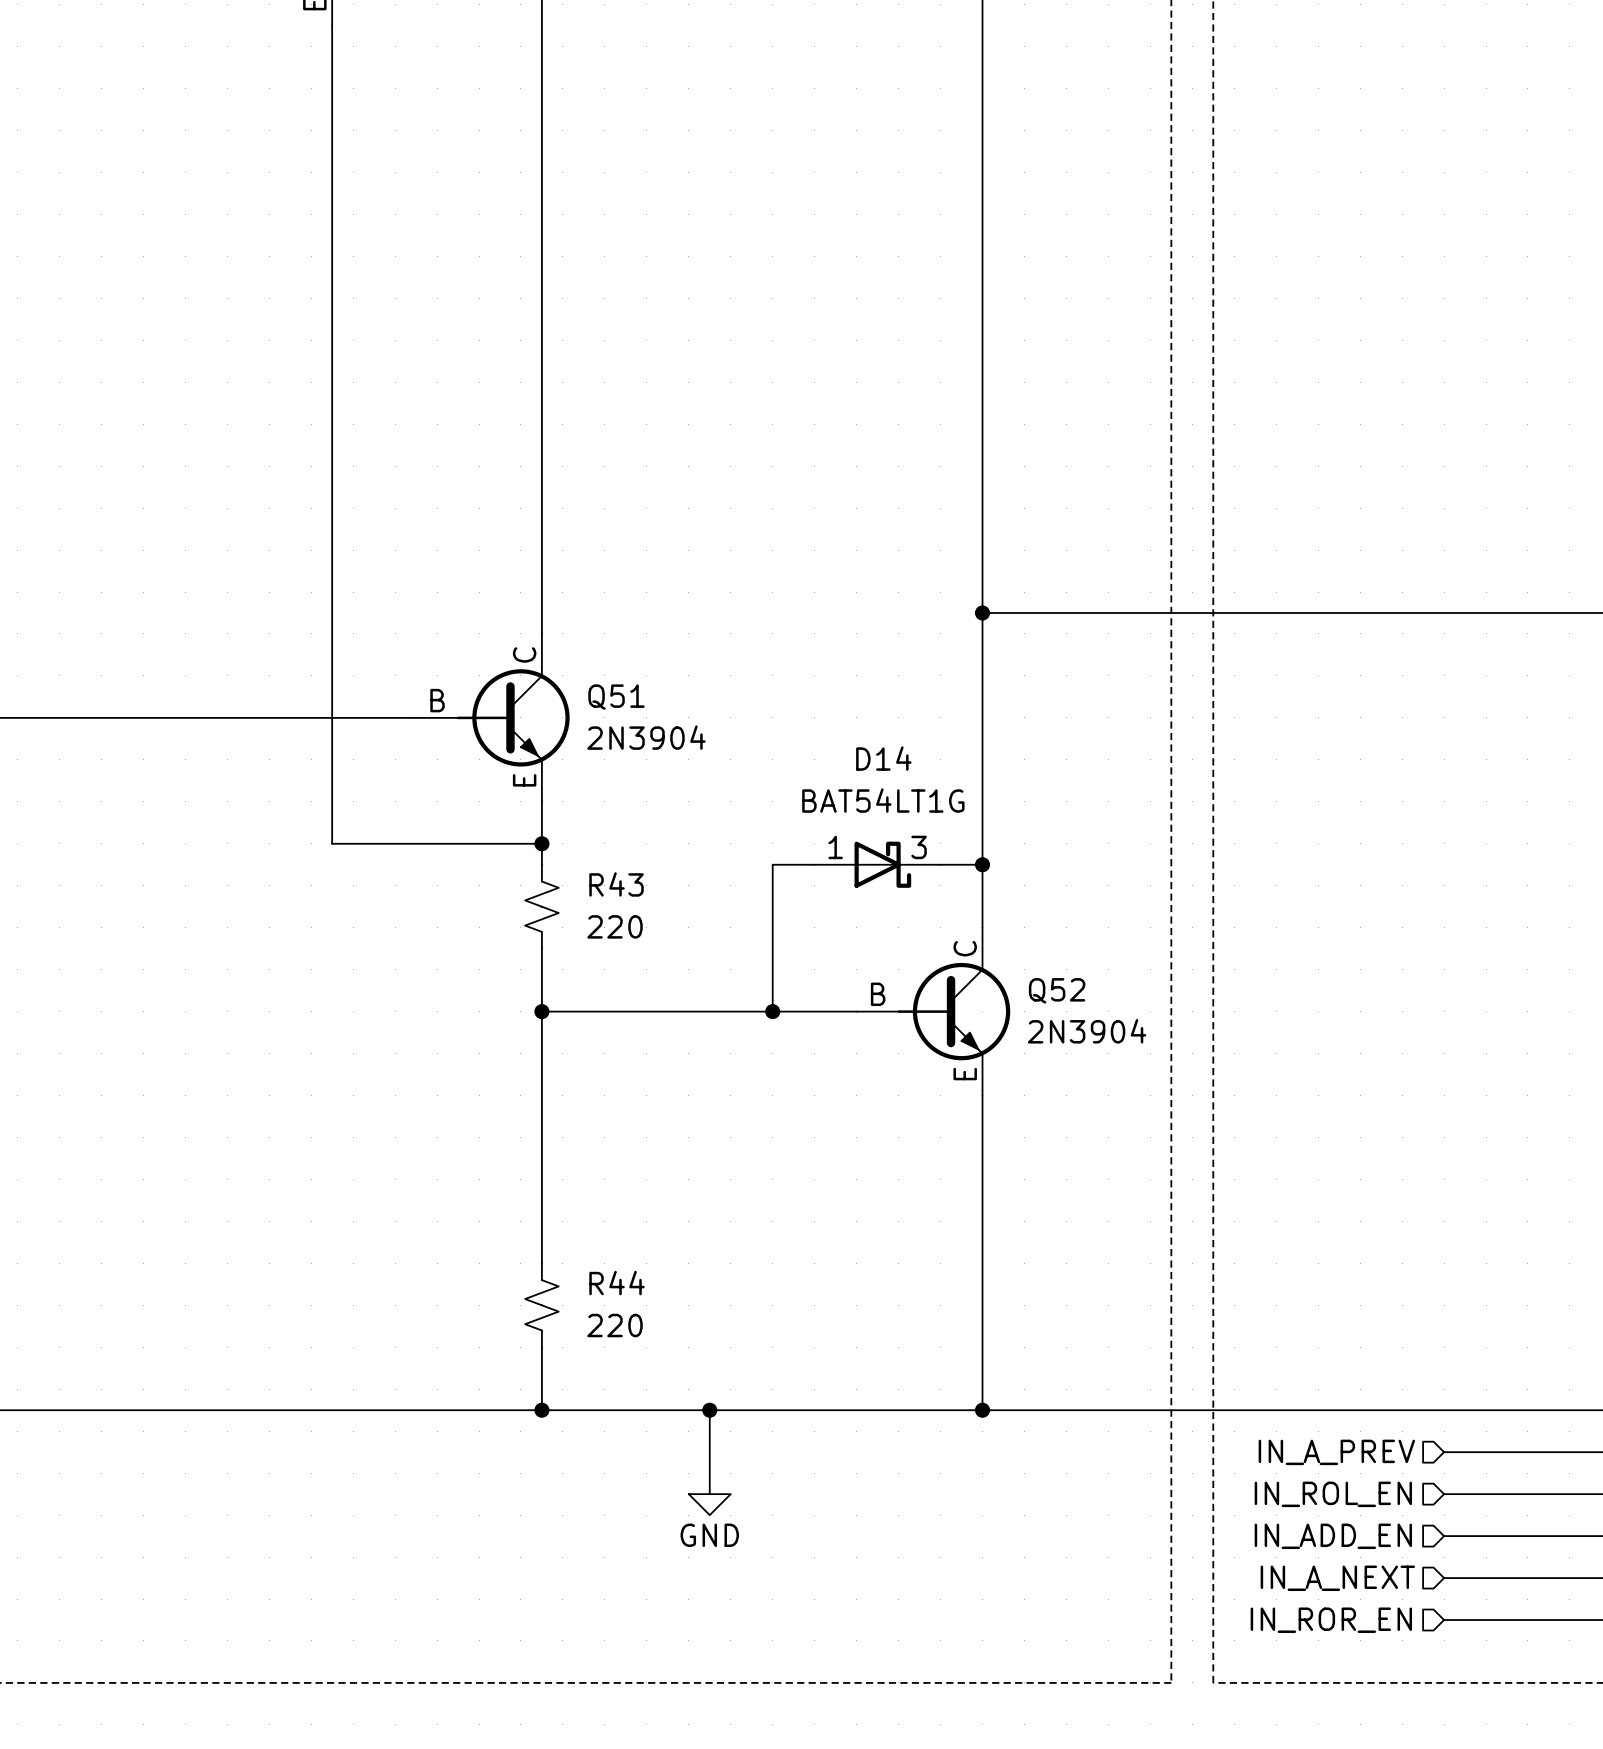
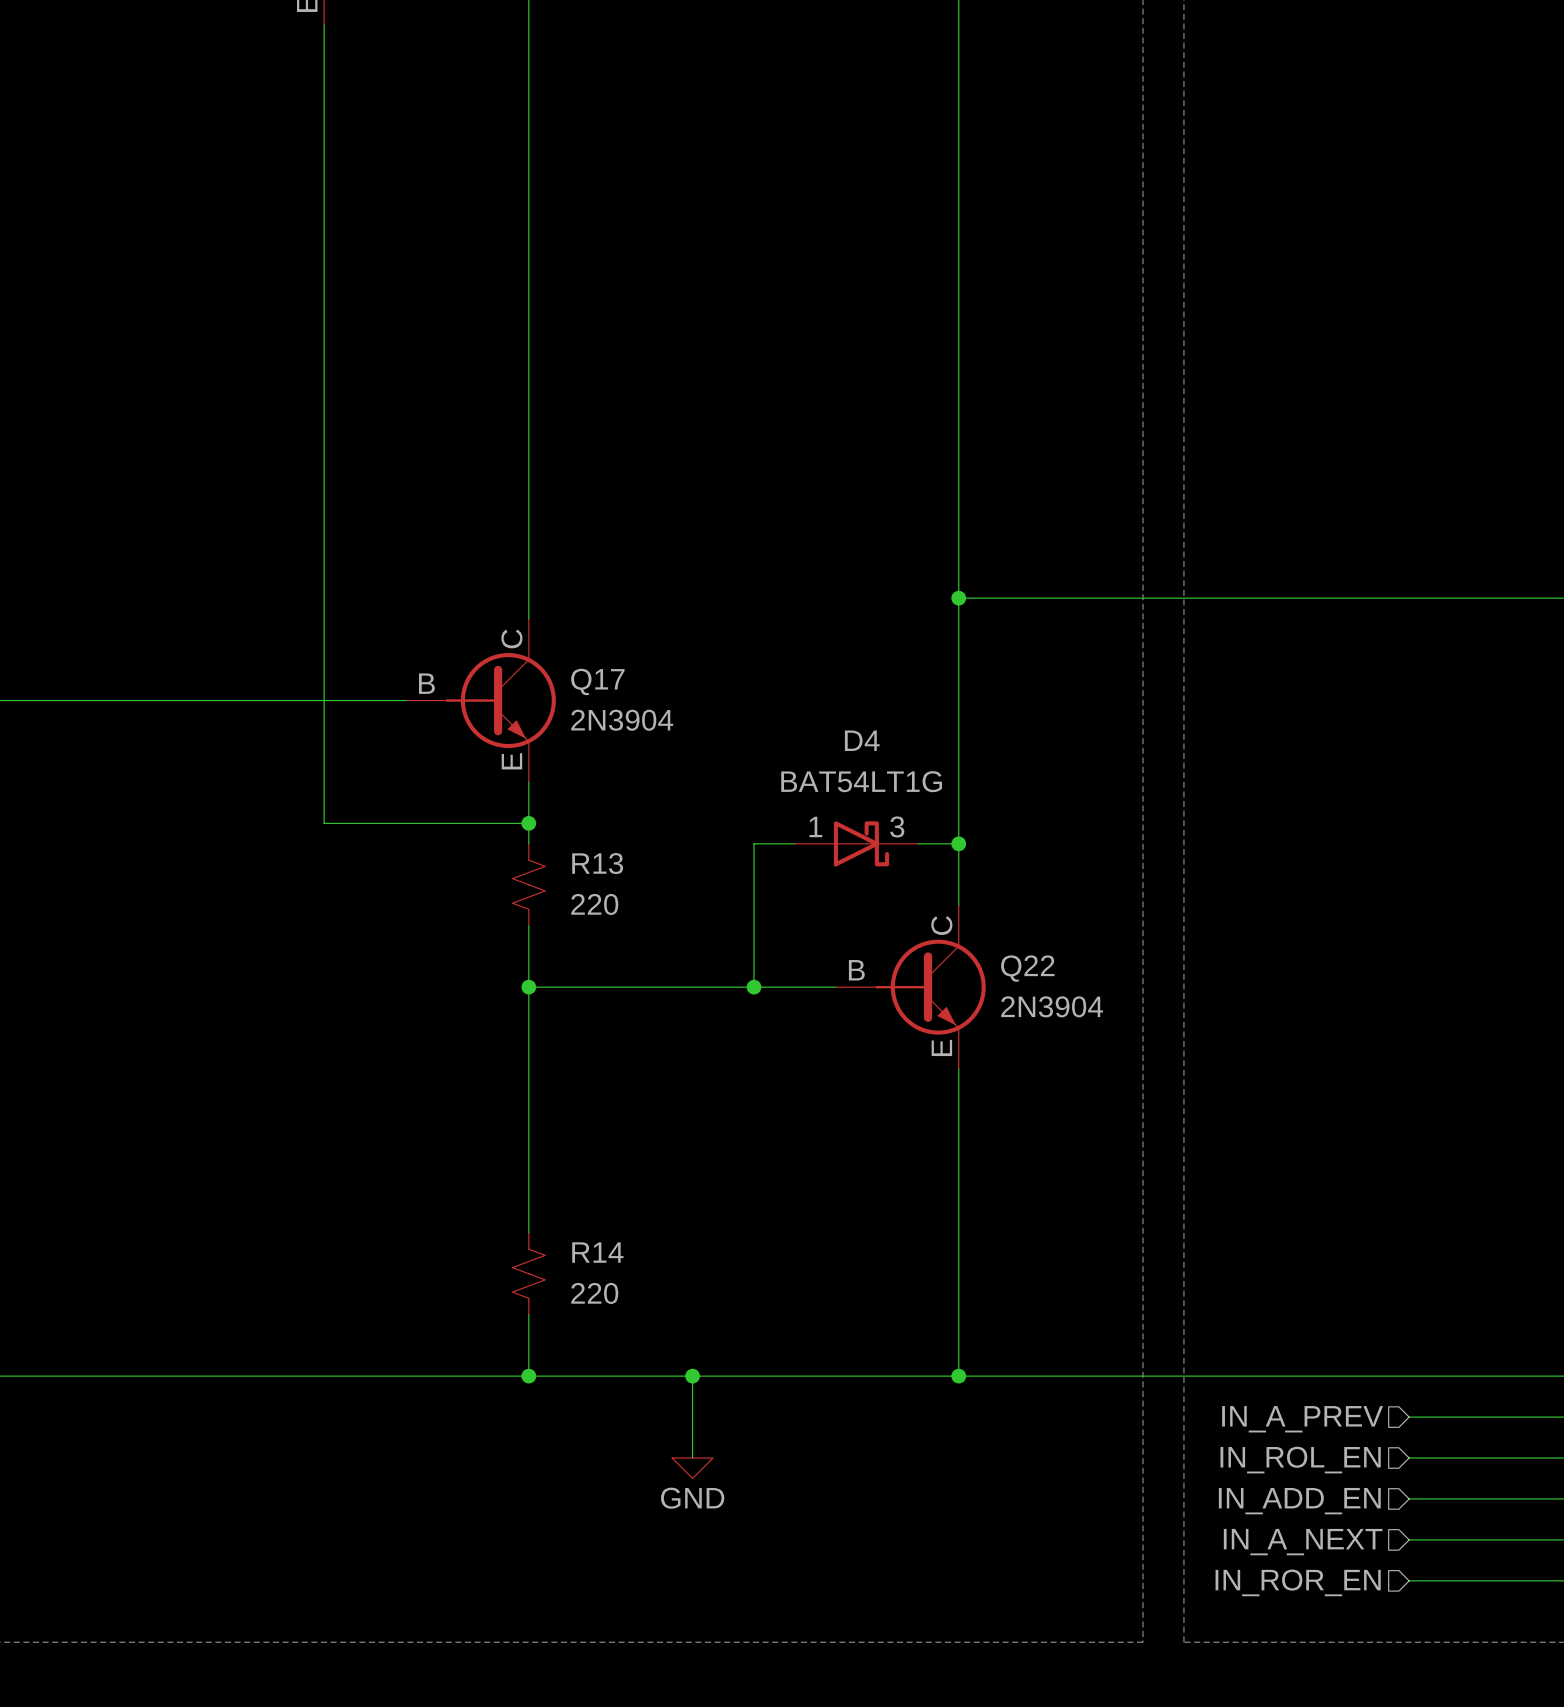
Q51 name: Q51 (616, 697) -> Q17 (597, 681)
D14 name: D14 (883, 758) -> D4 (862, 740)
R43 name: R43 (616, 884) -> R13 (597, 863)
Q52 name: Q52 (1057, 990) -> Q22 (1027, 968)
R44 name: R44 (617, 1283) -> R14 (597, 1252)

